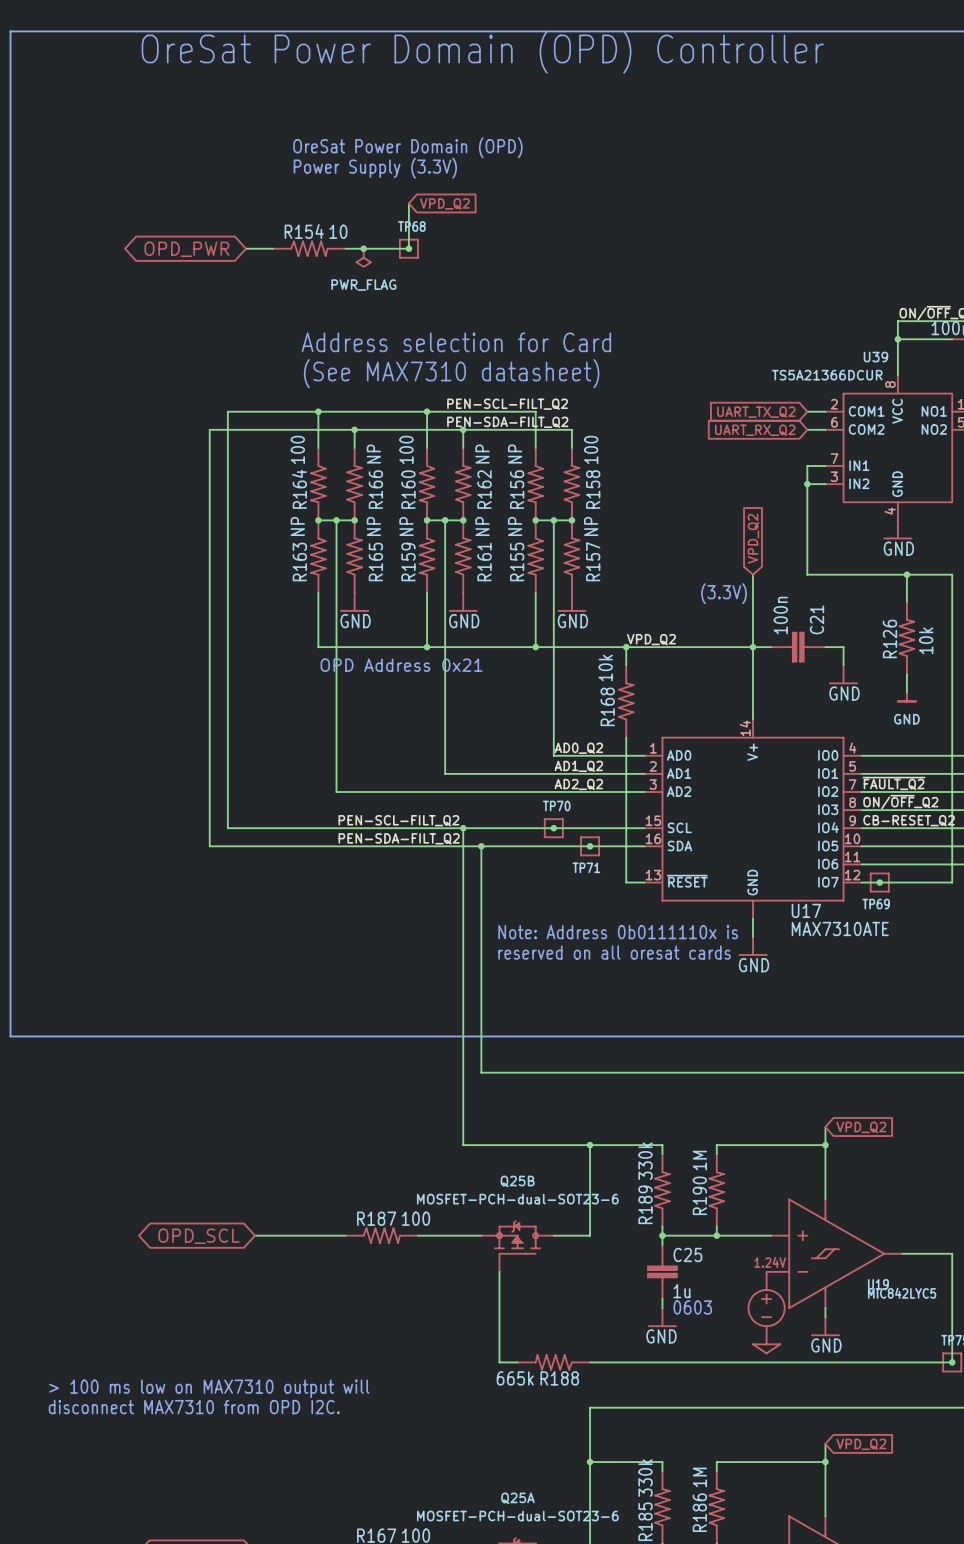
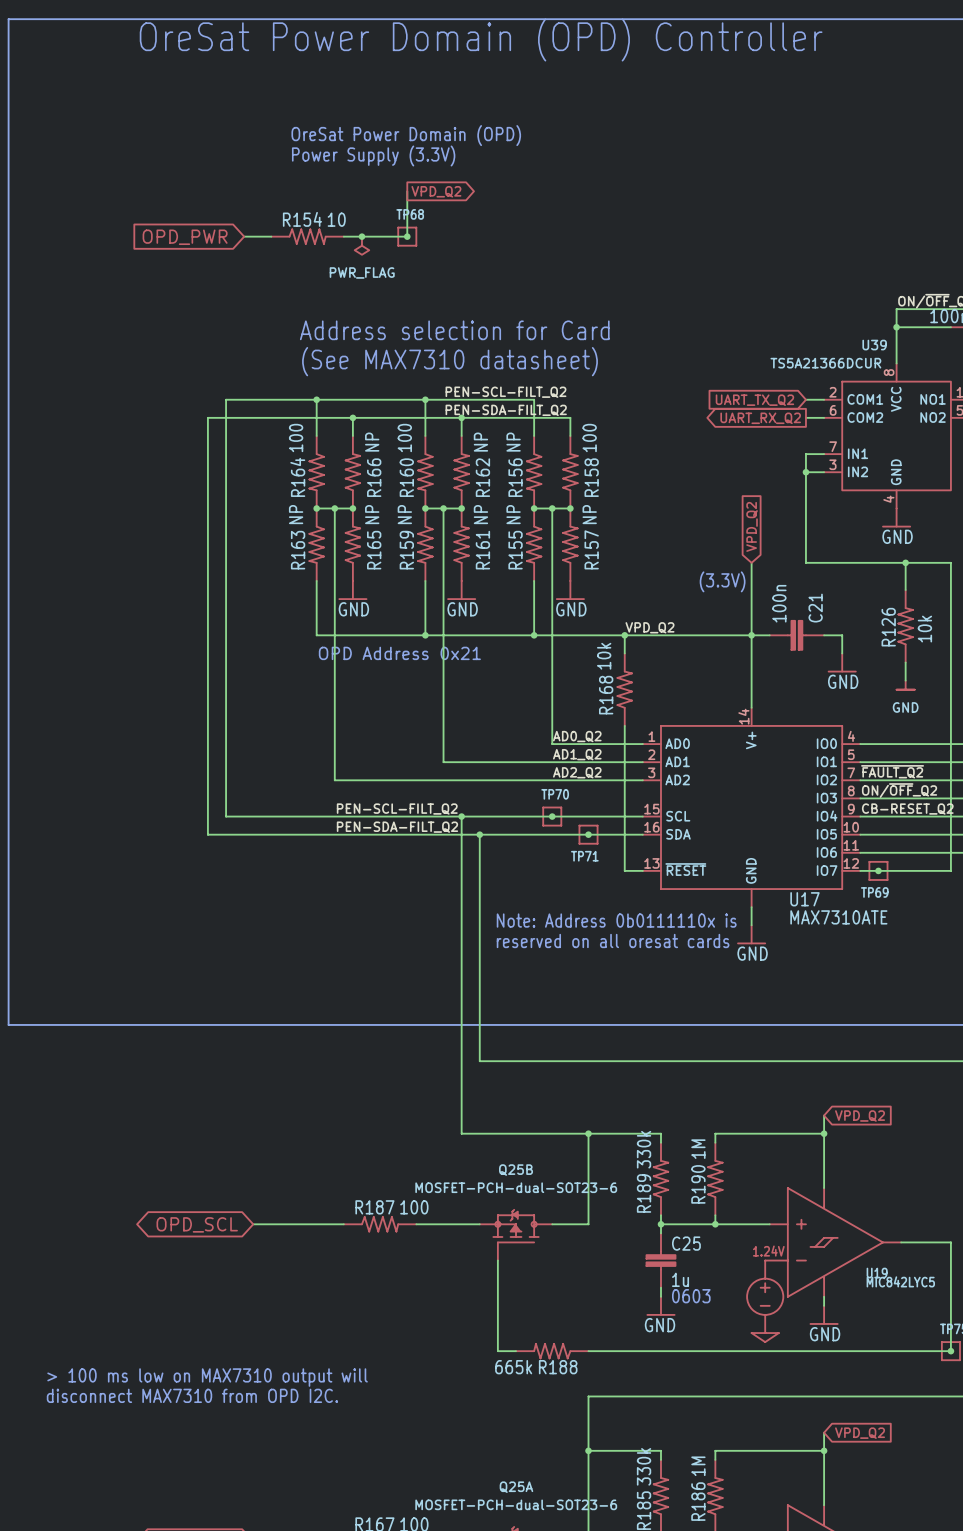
global label shape: input (444, 203) -> output (436, 191)
global label shape: bidirectional (186, 249) -> input (185, 237)
global label shape: input (755, 430) -> output (760, 418)

